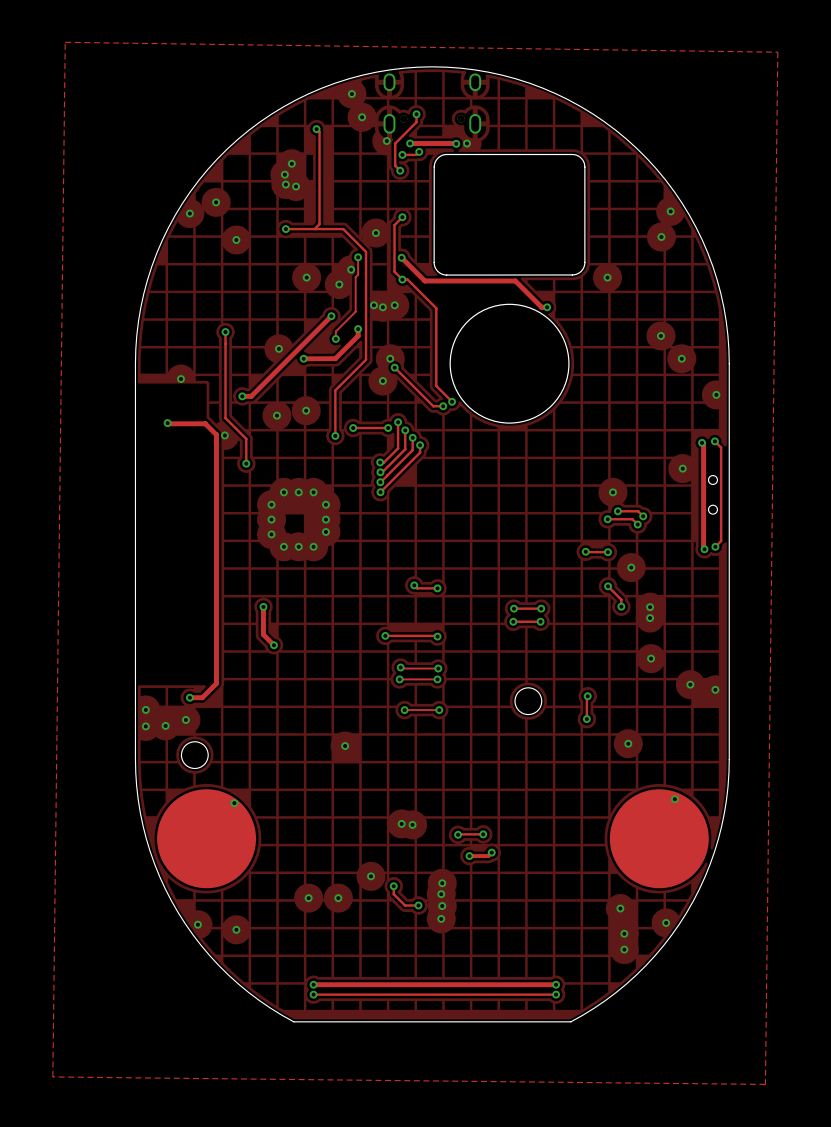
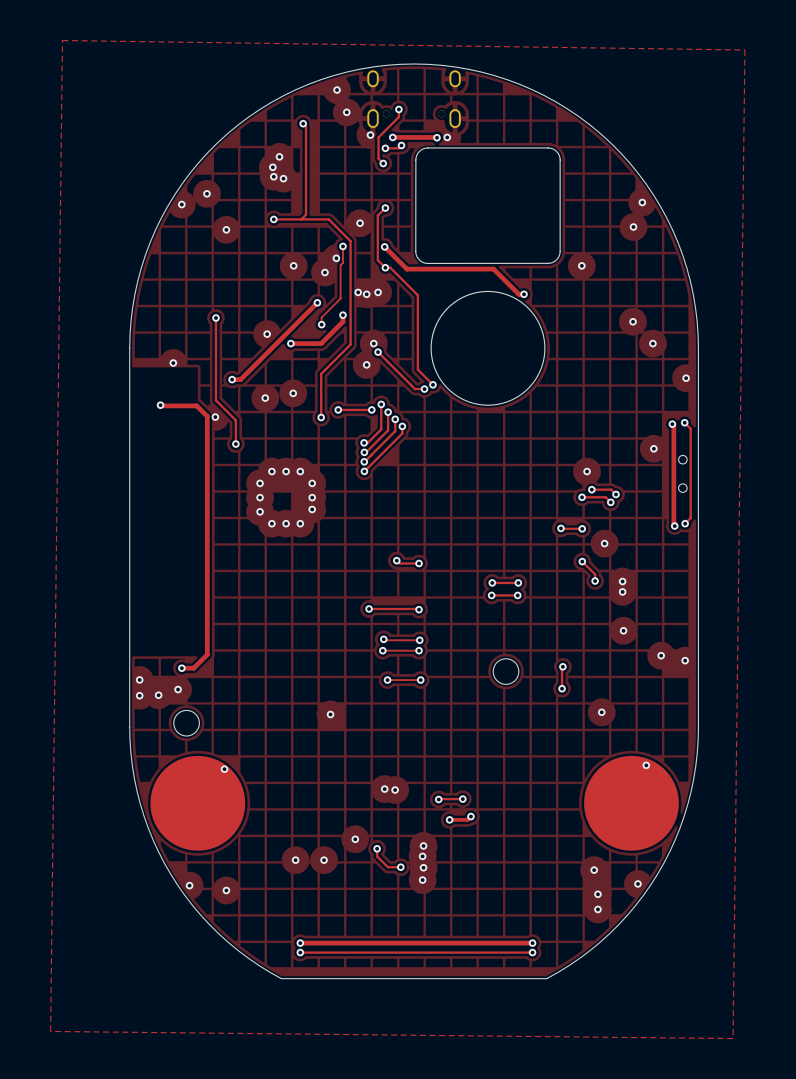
track: (263, 606) (263, 634) (274, 645) -> none
via: (263, 606) -> none
via: (274, 645) -> none

